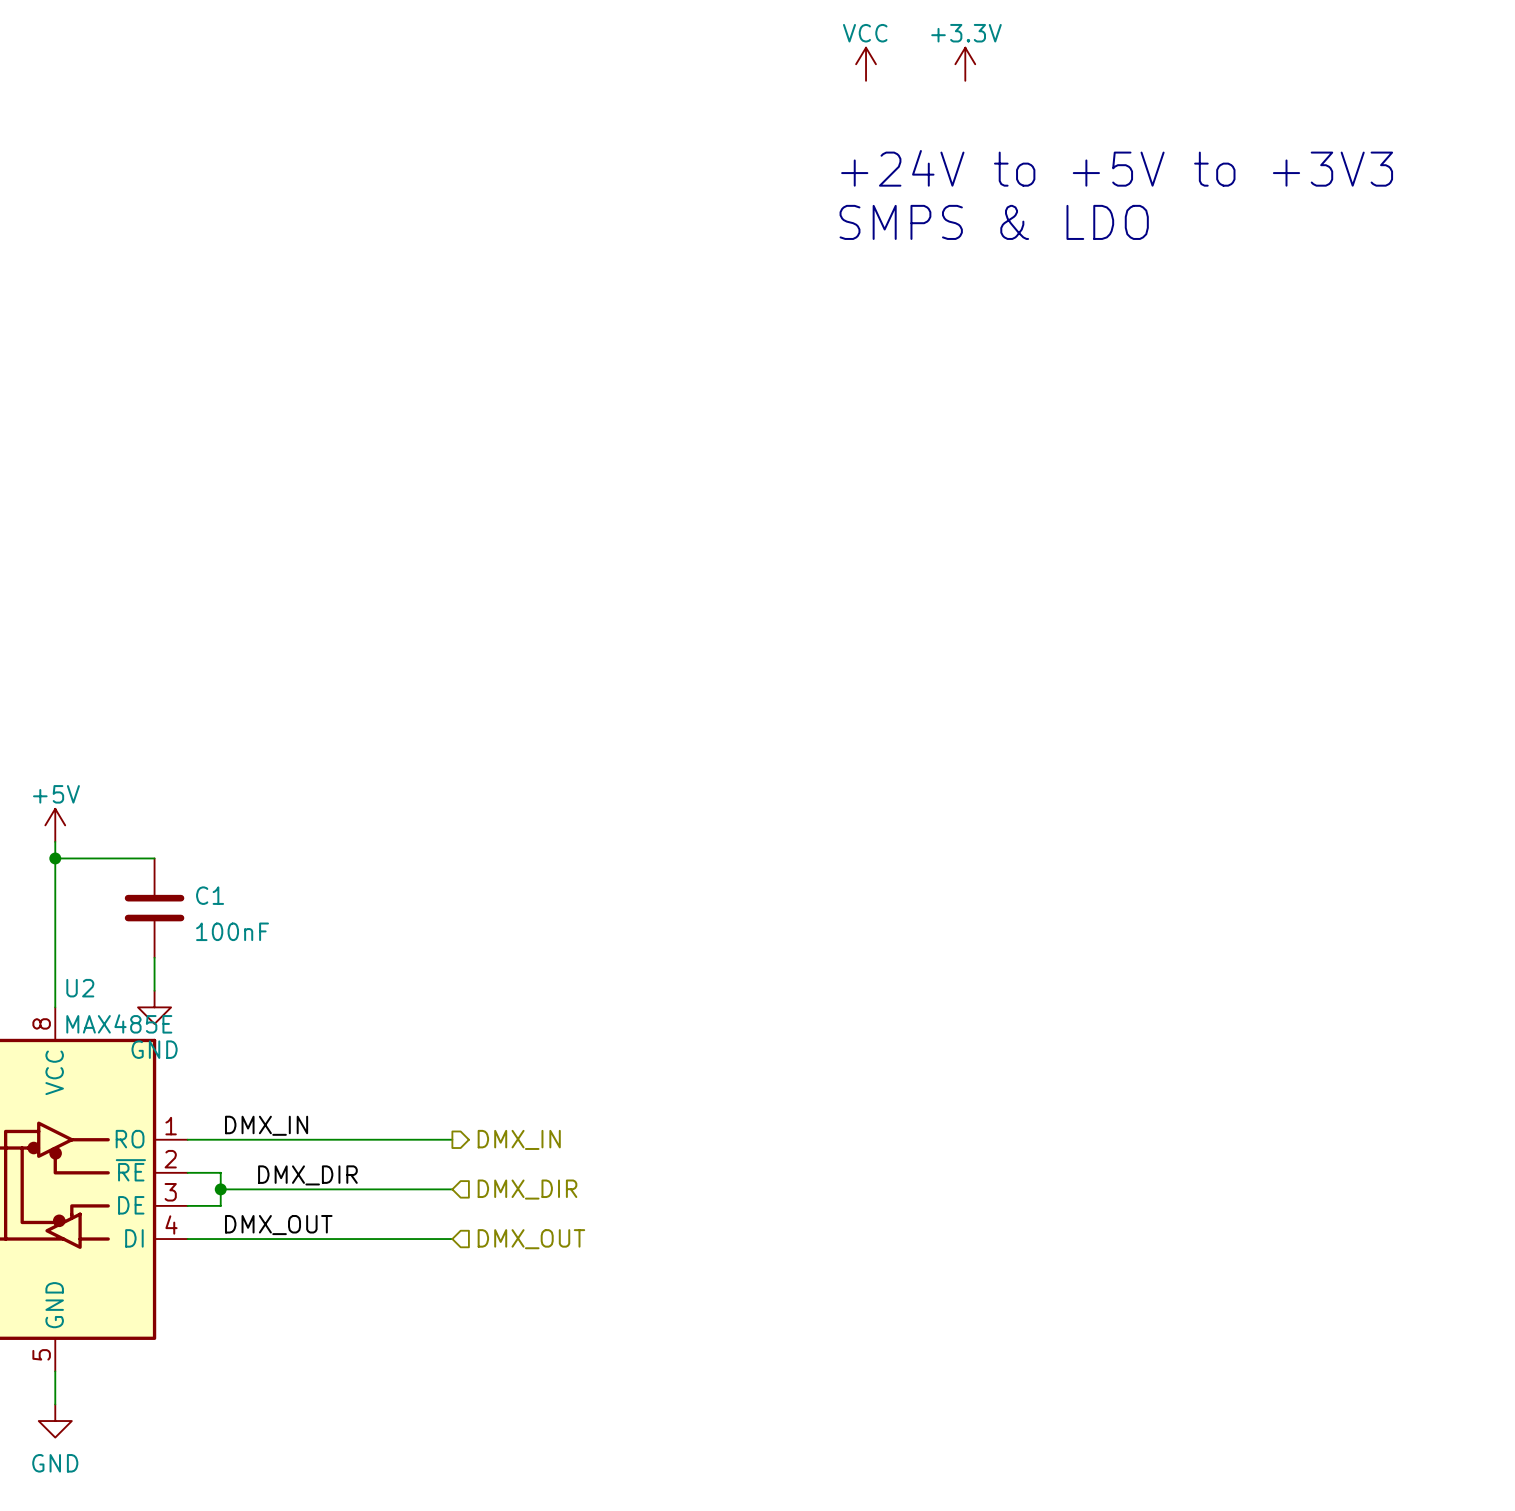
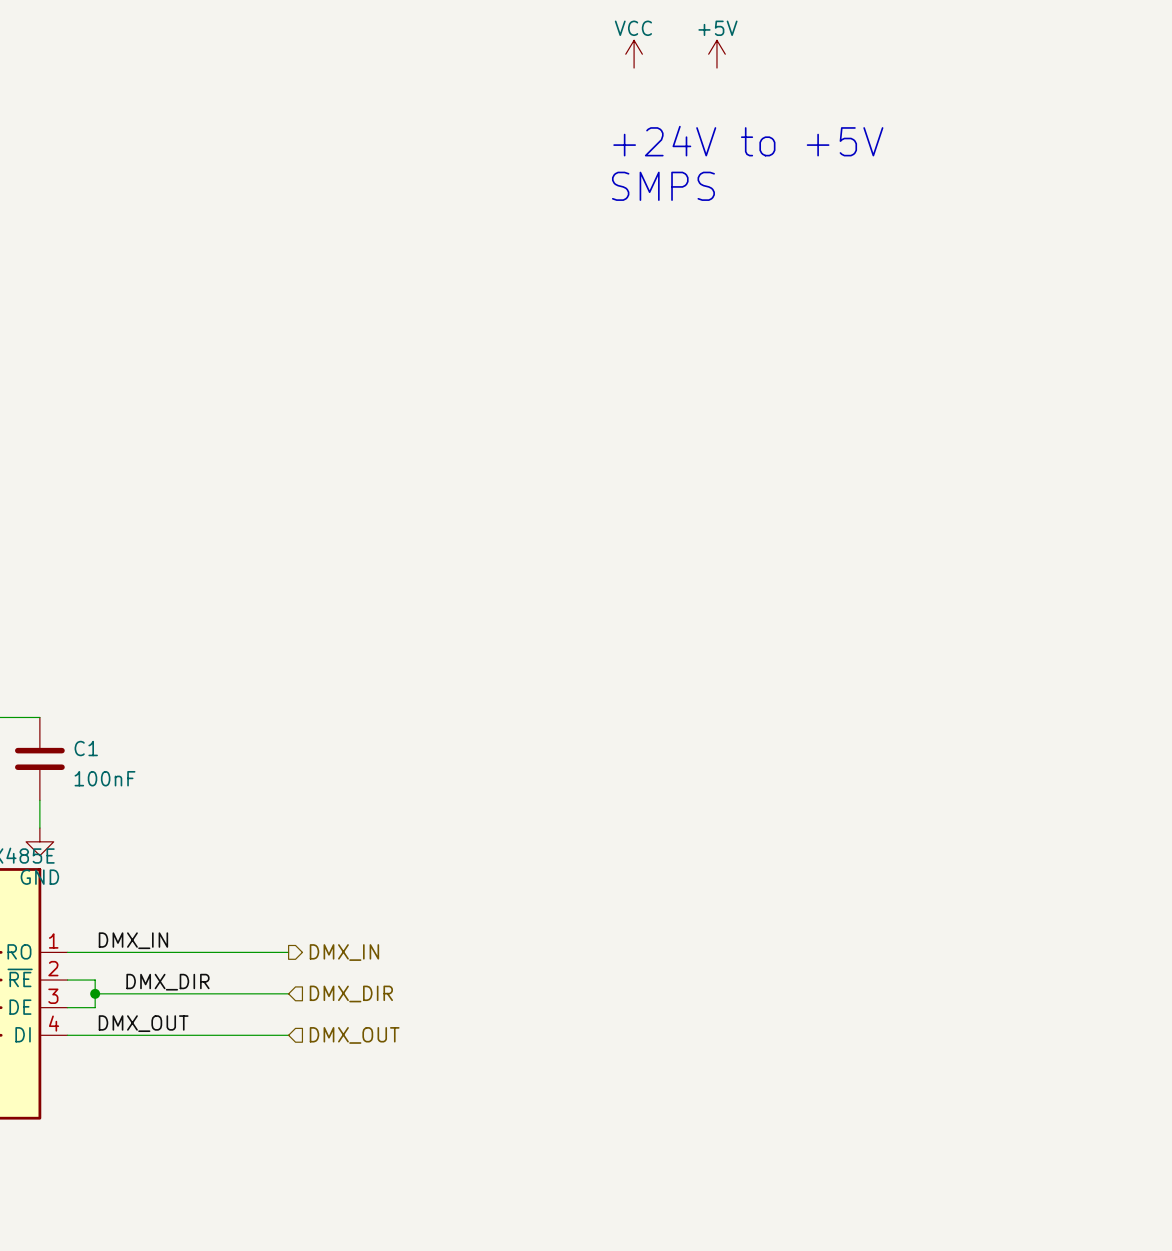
power symbol: +3.3V (965, 64) -> +5V (716, 54)
text: +24V to +5V to +3V3 (1117, 168) -> +24V to +5V (748, 141)
text: SMPS & LDO (994, 222) -> SMPS (663, 186)

